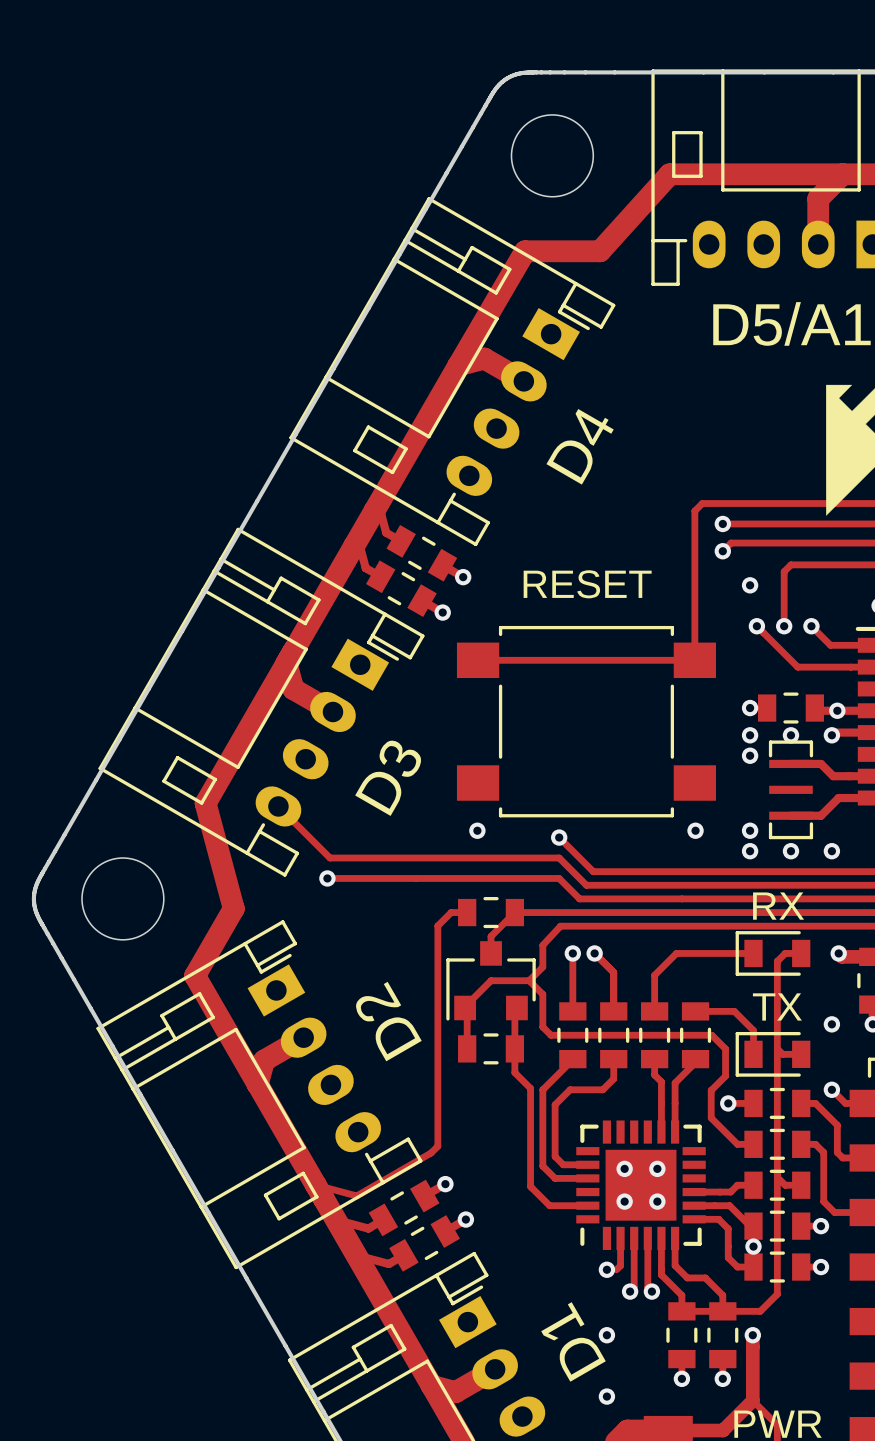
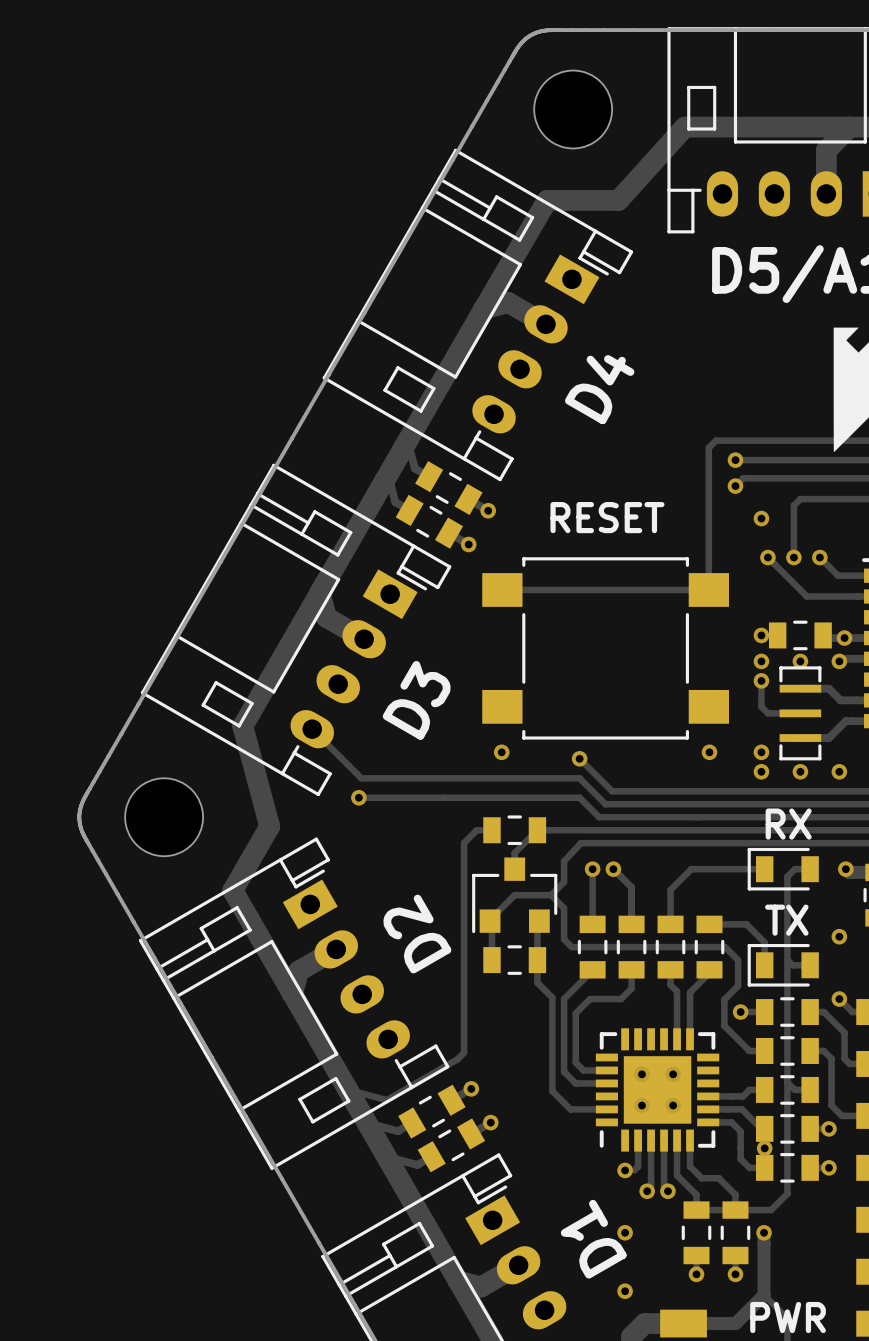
track: none -> (761, 680) (761, 706) (767, 713) (800, 713)

